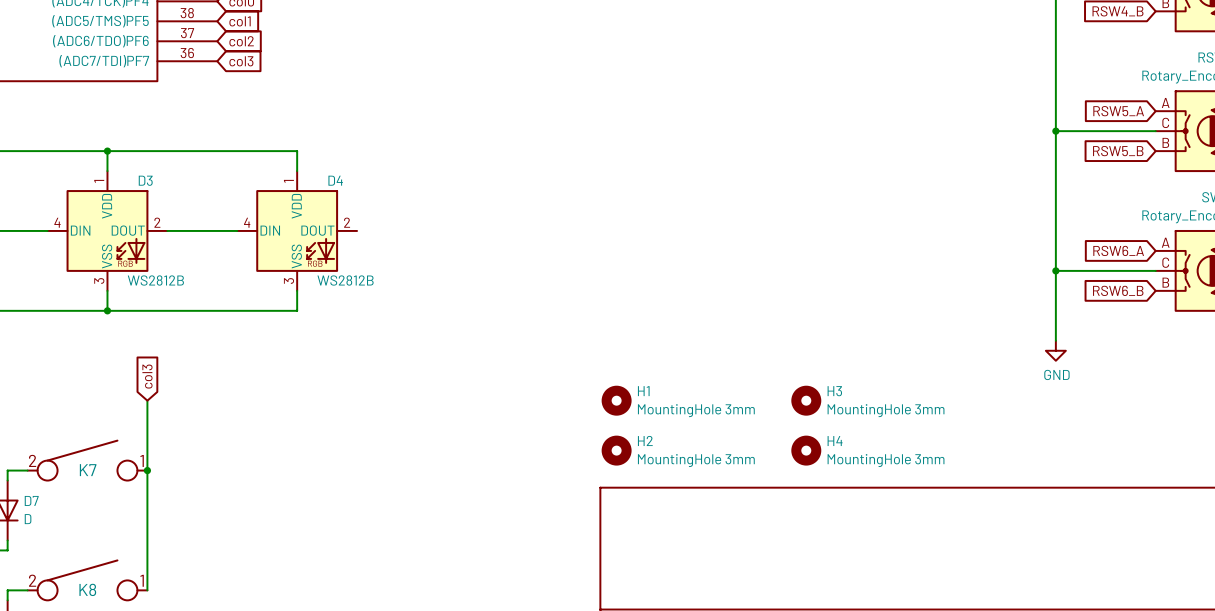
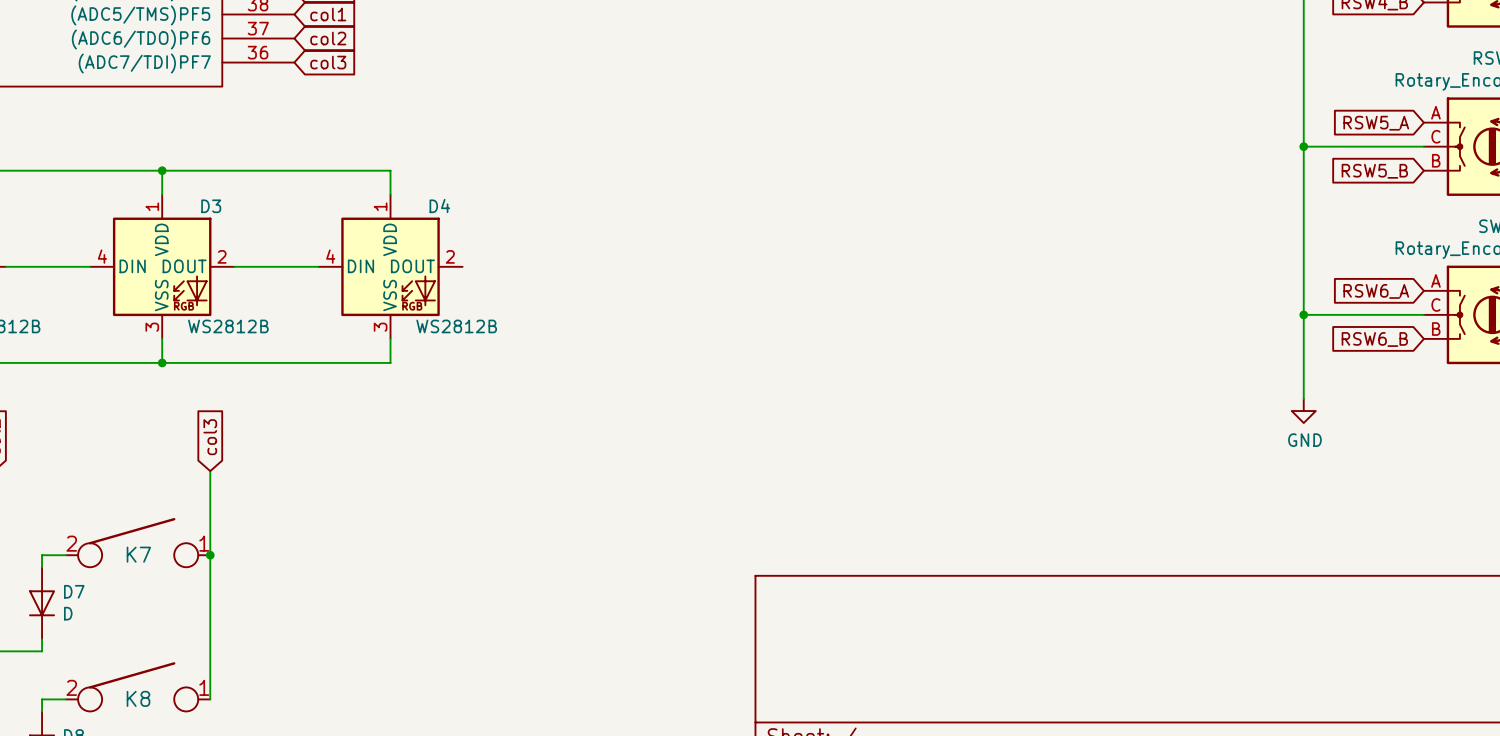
H1: MountingHole 3mm (616, 400) -> none
H3: MountingHole 3mm (806, 400) -> none
H2: MountingHole 3mm (616, 450) -> none
H4: MountingHole 3mm (806, 450) -> none

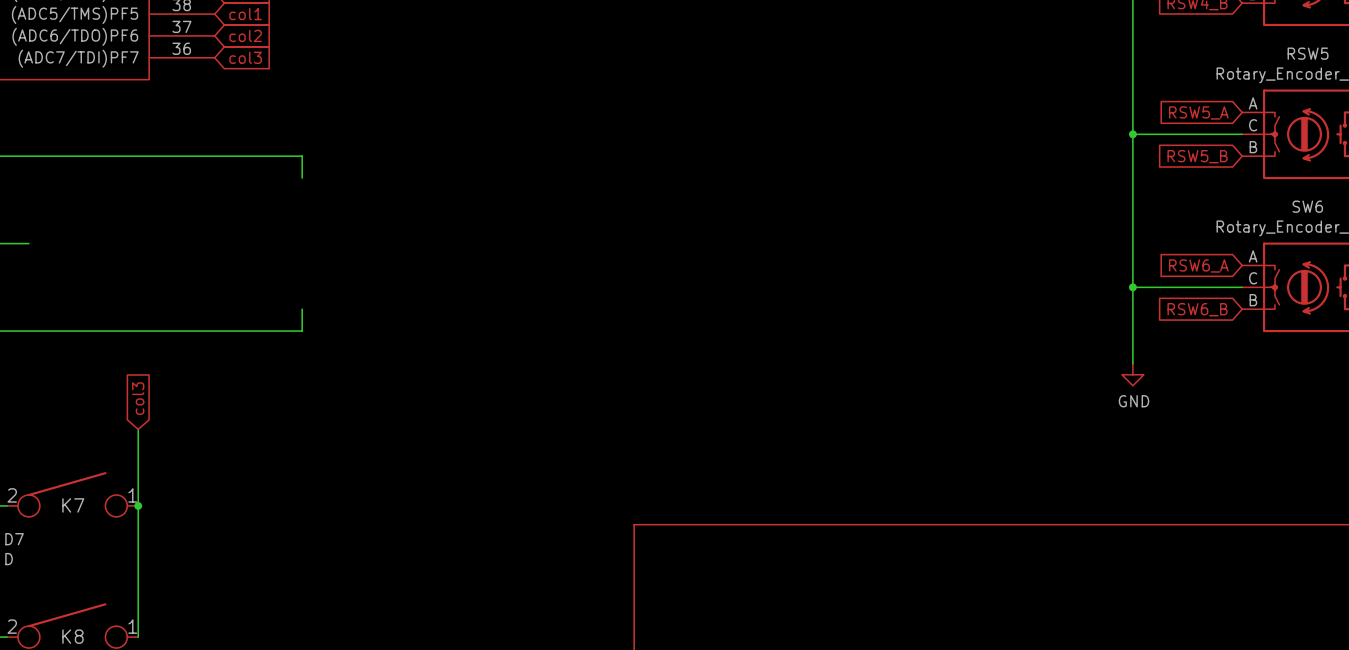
wire: (162, 170) (162, 194) -> none
junction: (162, 170) -> none
D3: WS2812B (162, 266) -> none
wire: (234, 266) (318, 266) -> none
D4: WS2812B (390, 266) -> none
wire: (162, 338) (162, 362) -> none
junction: (162, 362) -> none

